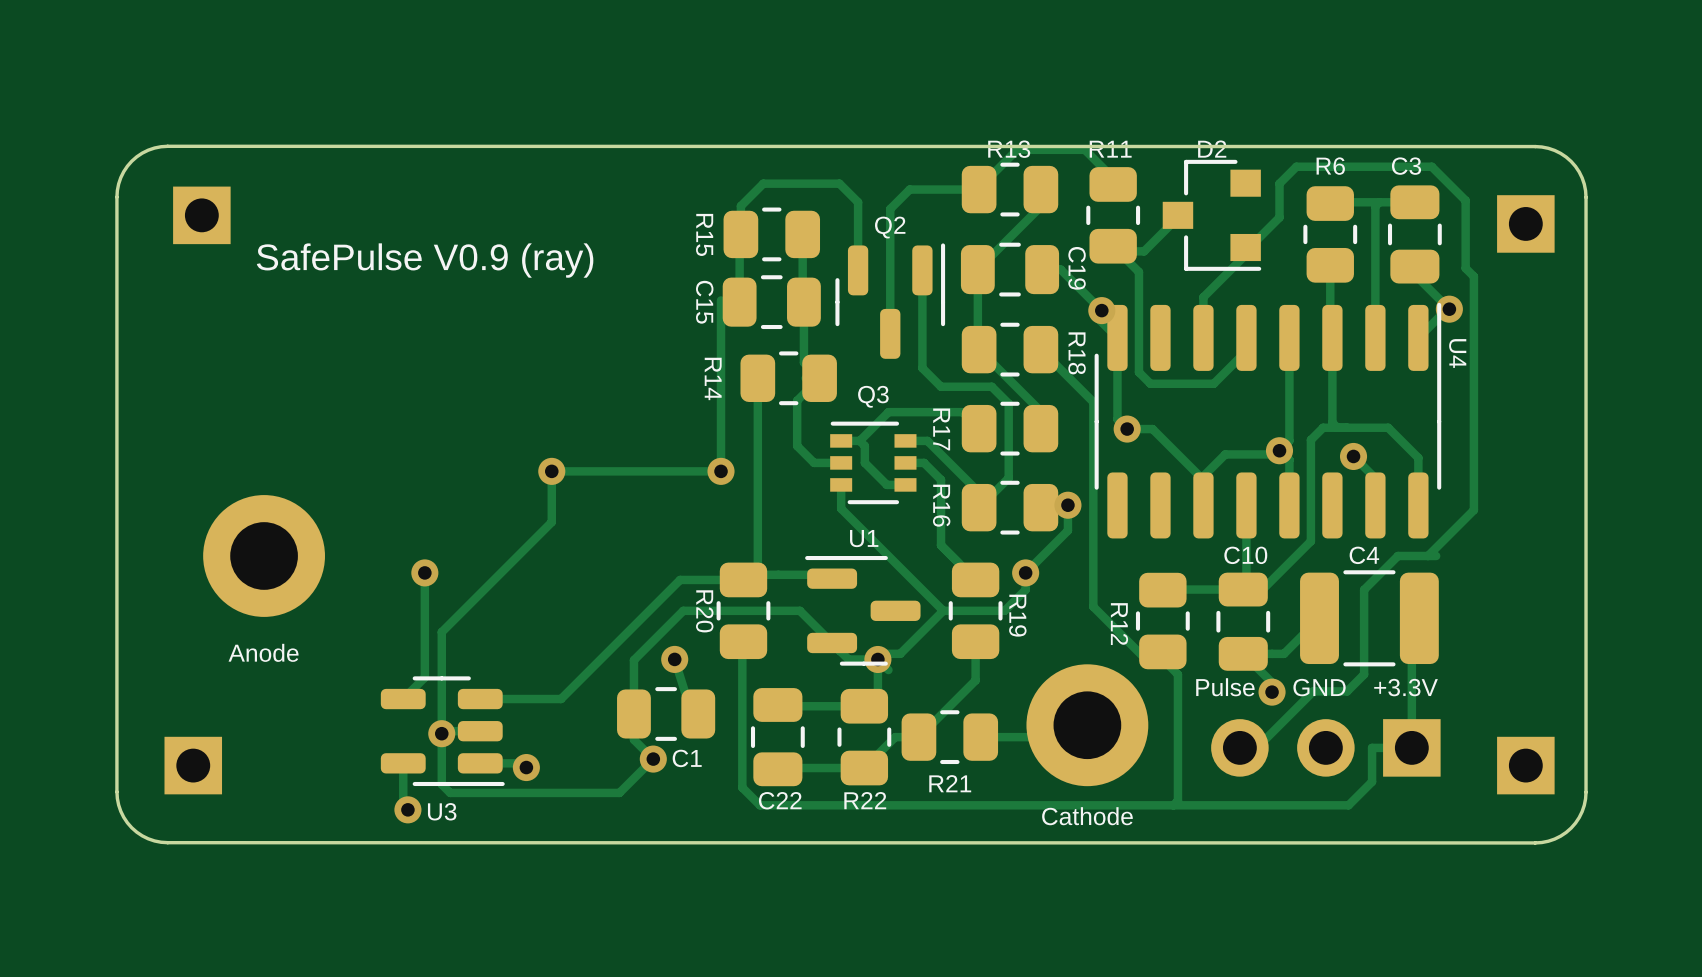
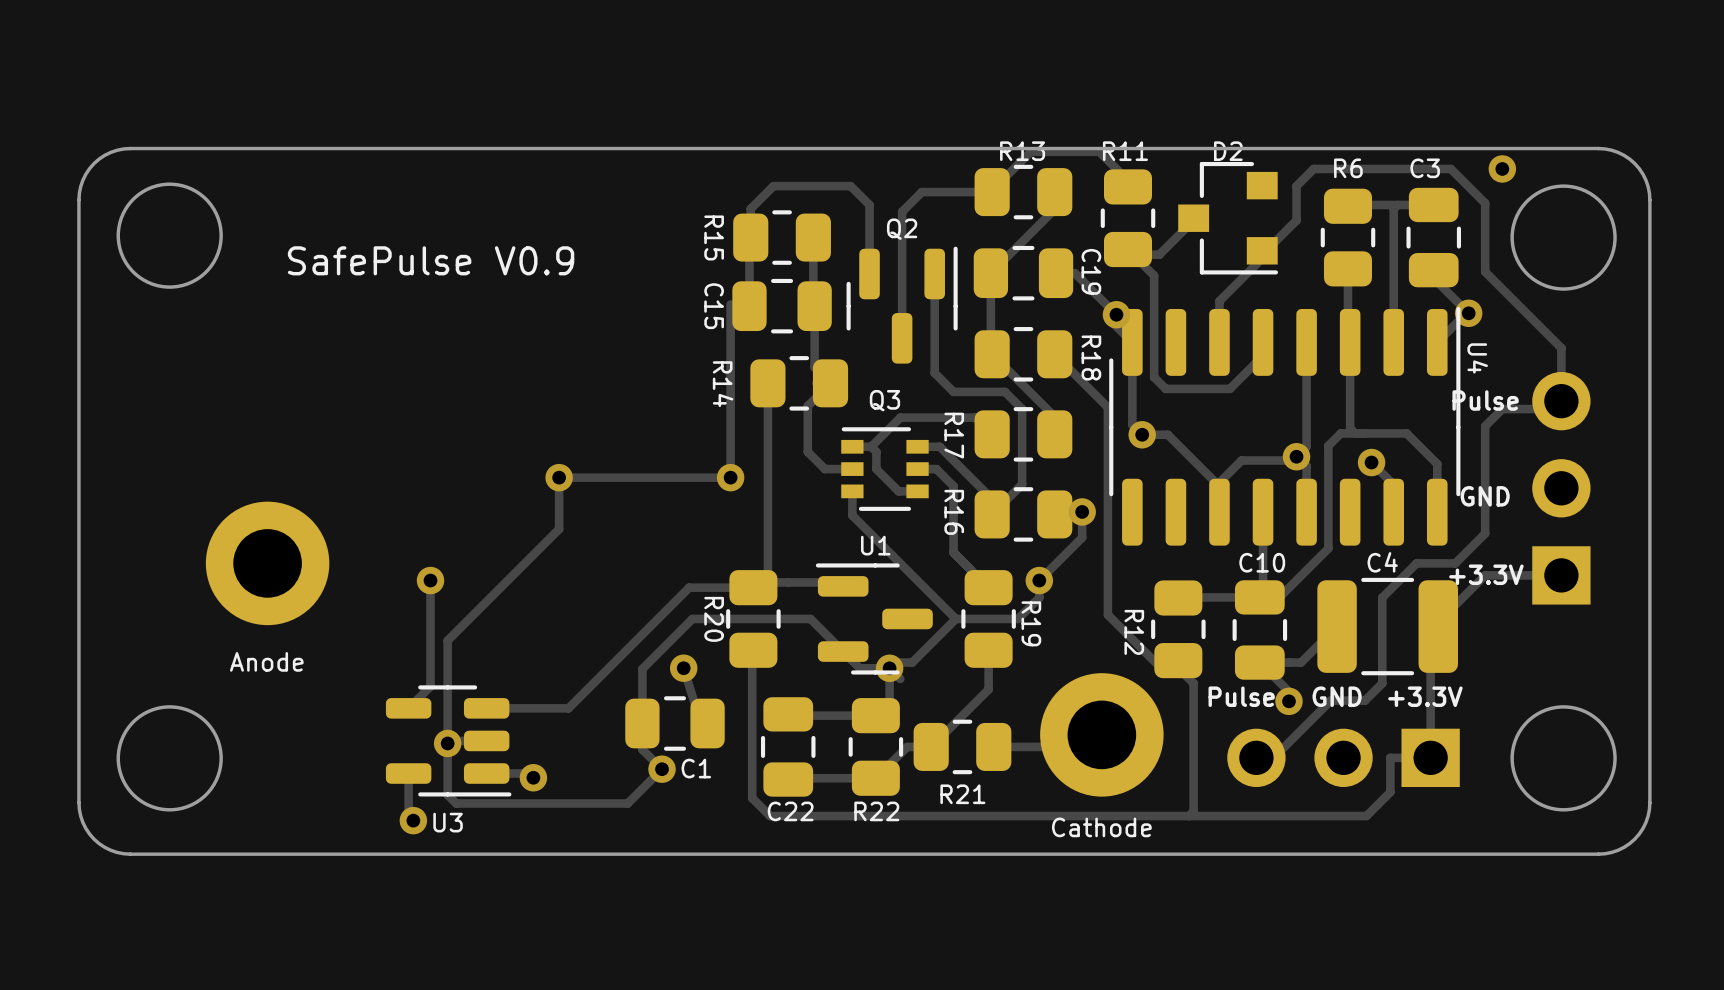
board edge: (1535, 146) (167, 146) (148, 150) (136, 156) (127, 166) (118, 183) (116, 197) (116, 791) (120, 811) (127, 822) (136, 832) (148, 838) (167, 842) (1535, 842) (1554, 839) (1566, 832) (1575, 823) (1582, 811) (1586, 792) (1586, 197) (1582, 177) (1571, 161) (1554, 150) (1535, 146) -> (1598, 148) (1618, 152) (1634, 163) (1645, 180) (1649, 199) (1649, 802) (1645, 822) (1639, 834) (1629, 843) (1618, 850) (1598, 854) (130, 854) (110, 850) (99, 843) (89, 834) (82, 822) (78, 802) (78, 199) (80, 186) (89, 168) (99, 159) (110, 152) (130, 148) (1598, 148)
via: none -> (1502, 168)
round board edge: none -> [116, 182, 223, 289]
round board edge: none -> [1510, 184, 1617, 291]
part: (201, 215) -> none
part: (1525, 223) -> none
text: SafePulse V0.9 (ray) (425, 260) -> SafePulse V0.9 (431, 260)
track: (1473, 276) (1473, 510) (1428, 555) -> (1493, 280) (1561, 348) (1561, 401)
text: none -> Pulse (1485, 400)
track: none -> (1553, 409) (1502, 409) (1485, 426) (1485, 533) (1455, 563)
part: none -> (1561, 488)
text: none -> GND (1485, 496)
text: none -> +3.3V (1486, 574)
track: none -> (1561, 575) (1485, 575) (1438, 622)
round board edge: none -> [116, 705, 223, 812]
round board edge: none -> [1510, 705, 1617, 812]
part: (193, 765) -> none
part: (1525, 765) -> none

